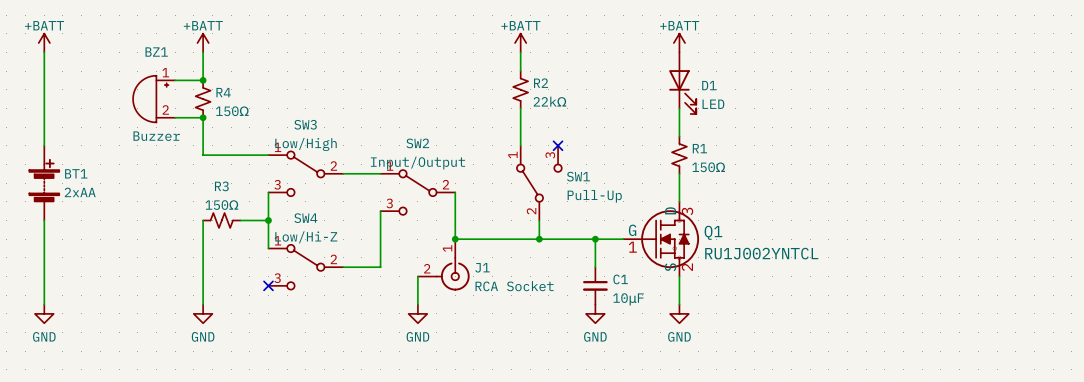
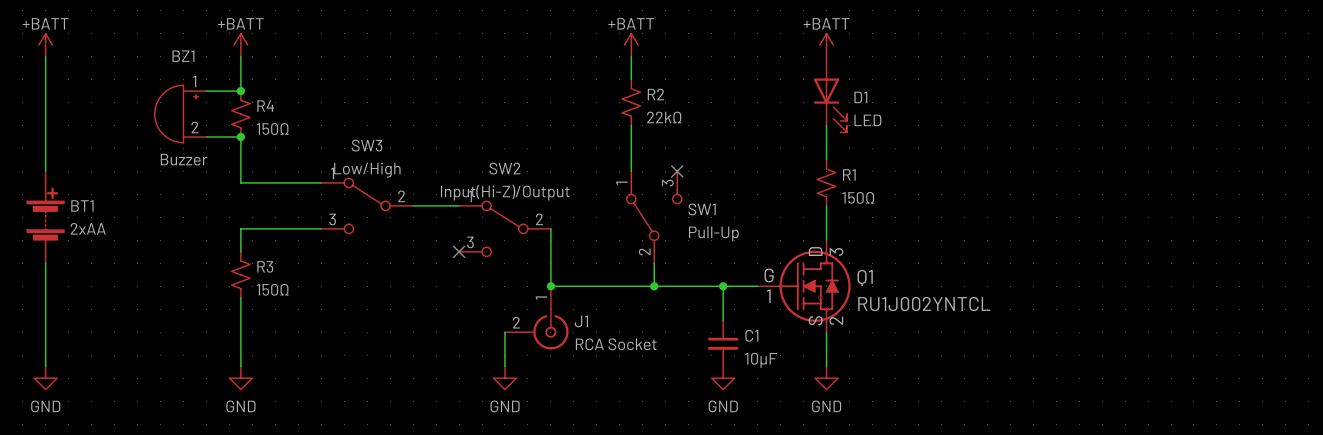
SW2 value: Input/Output (417, 163) -> Input(Hi-Z)/Output (505, 192)
wire: (268, 192) (268, 248) -> (321, 228) (240, 228) (240, 251)
R3 value position: 150Ω (221, 205) -> 150Ω (272, 289)
wire: (380, 211) (380, 267) (343, 267) -> none
no-connect mark: none -> (459, 251)
R3 rotation: 0° (221, 220) -> 90° clockwise (240, 274)
wire: (240, 220) (268, 220) -> none
junction: (268, 220) -> none
SW4: Low/Hi-Z (305, 267) -> none
no-connect mark: (268, 285) -> none

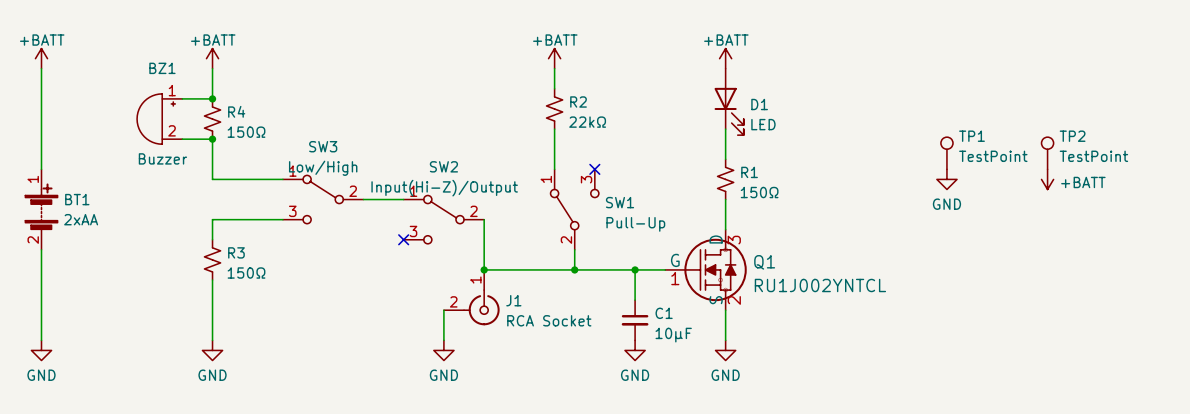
TP1: none -> TestPoint (946, 153)
TP2: none -> TestPoint (1047, 153)
power symbol: none -> GND (946, 179)
power symbol: none -> +BATT (1047, 179)
BT1 pin number: none -> 1 (33, 179)
BT1 pin number: none -> 2 (33, 240)

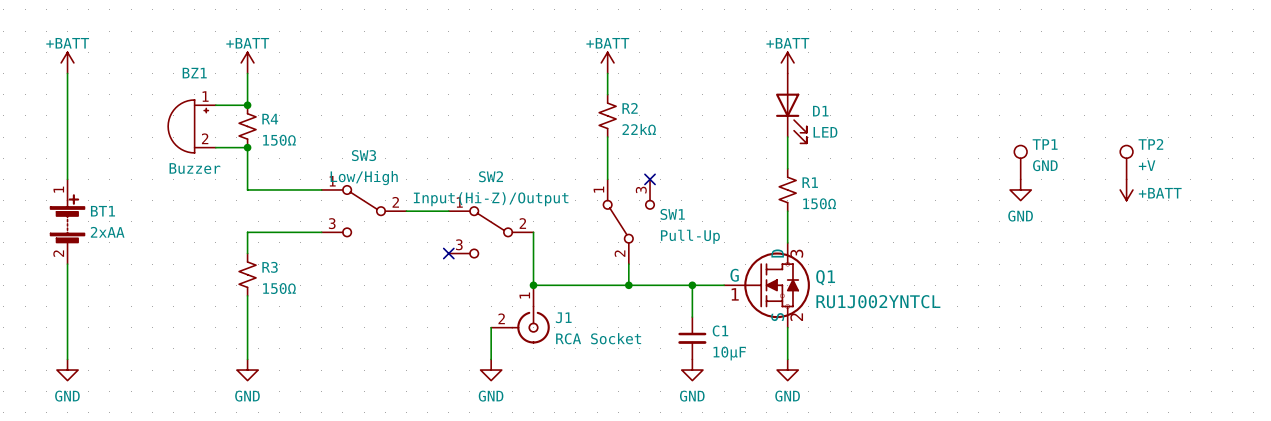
TP1 value: TestPoint (993, 156) -> GND (1045, 165)
TP2 value: TestPoint (1093, 156) -> +V (1147, 165)

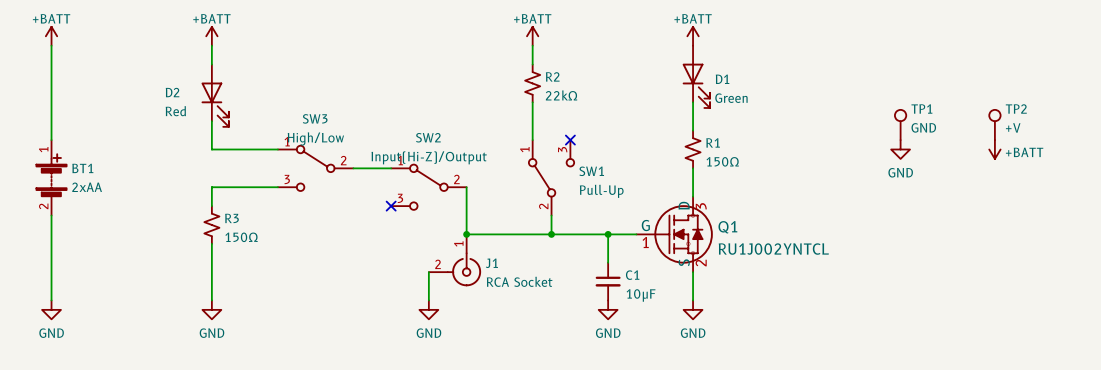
wire: (247, 94) (247, 105) (215, 105) -> none
junction: (247, 105) -> none
BZ1: Buzzer (191, 126) -> none
R4: 150Ω (247, 126) -> none
D2: none -> Red (215, 95)
D1 value: LED (825, 132) -> Green (731, 98)
wire: (215, 147) (247, 147) (247, 158) -> none
junction: (247, 147) -> none
SW3 value: Low/High (364, 178) -> High/Low (315, 138)

